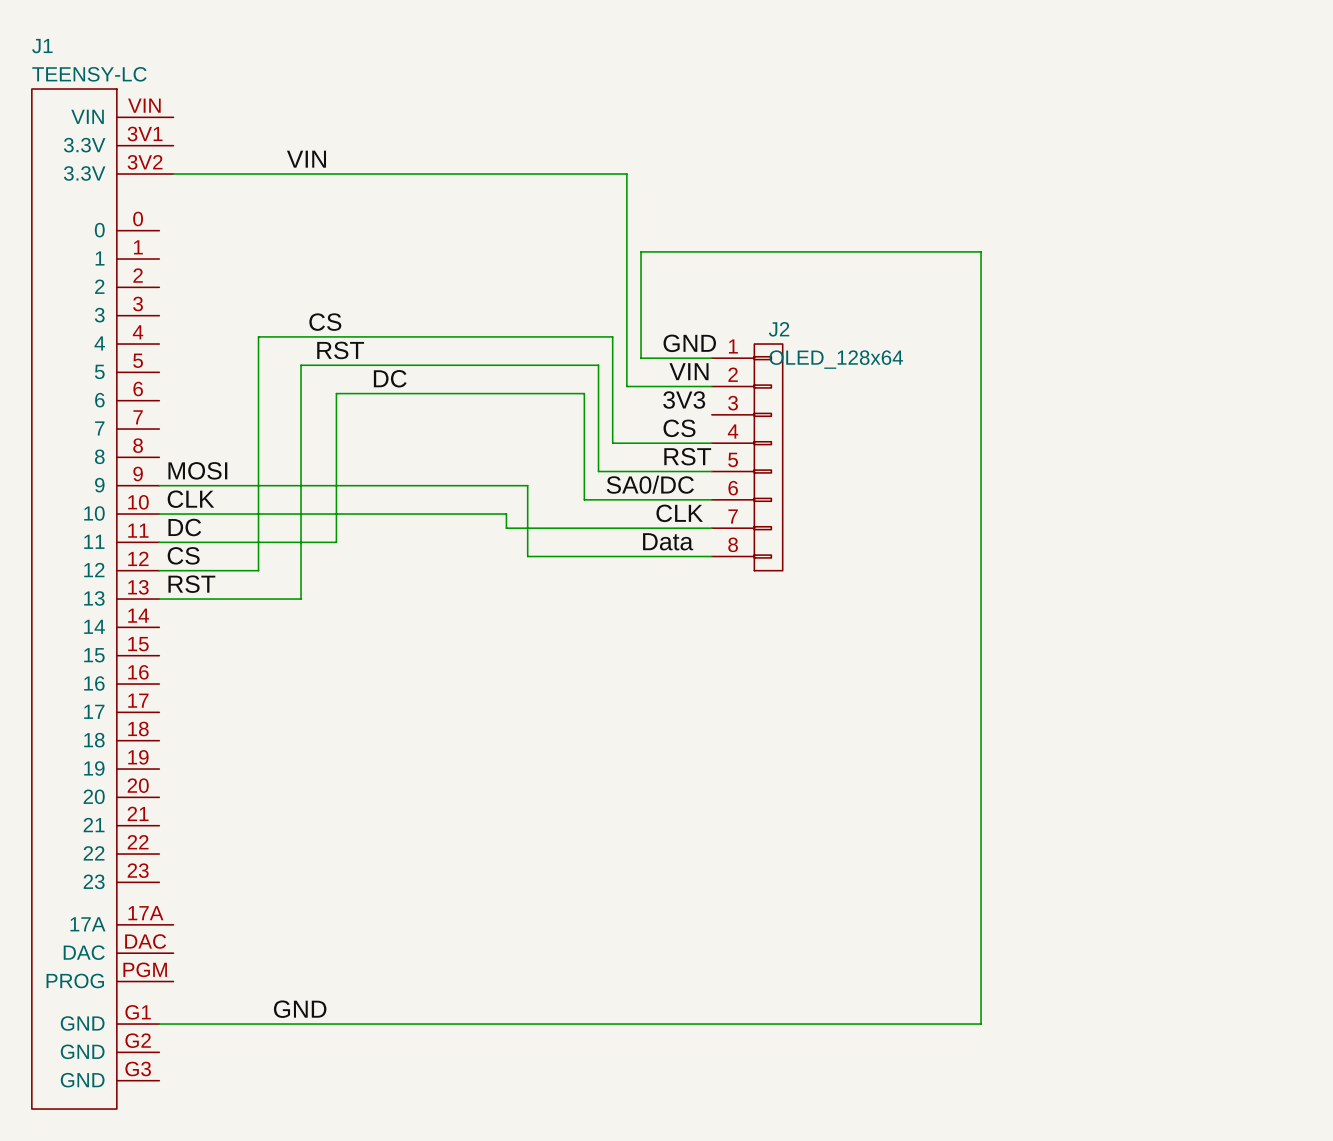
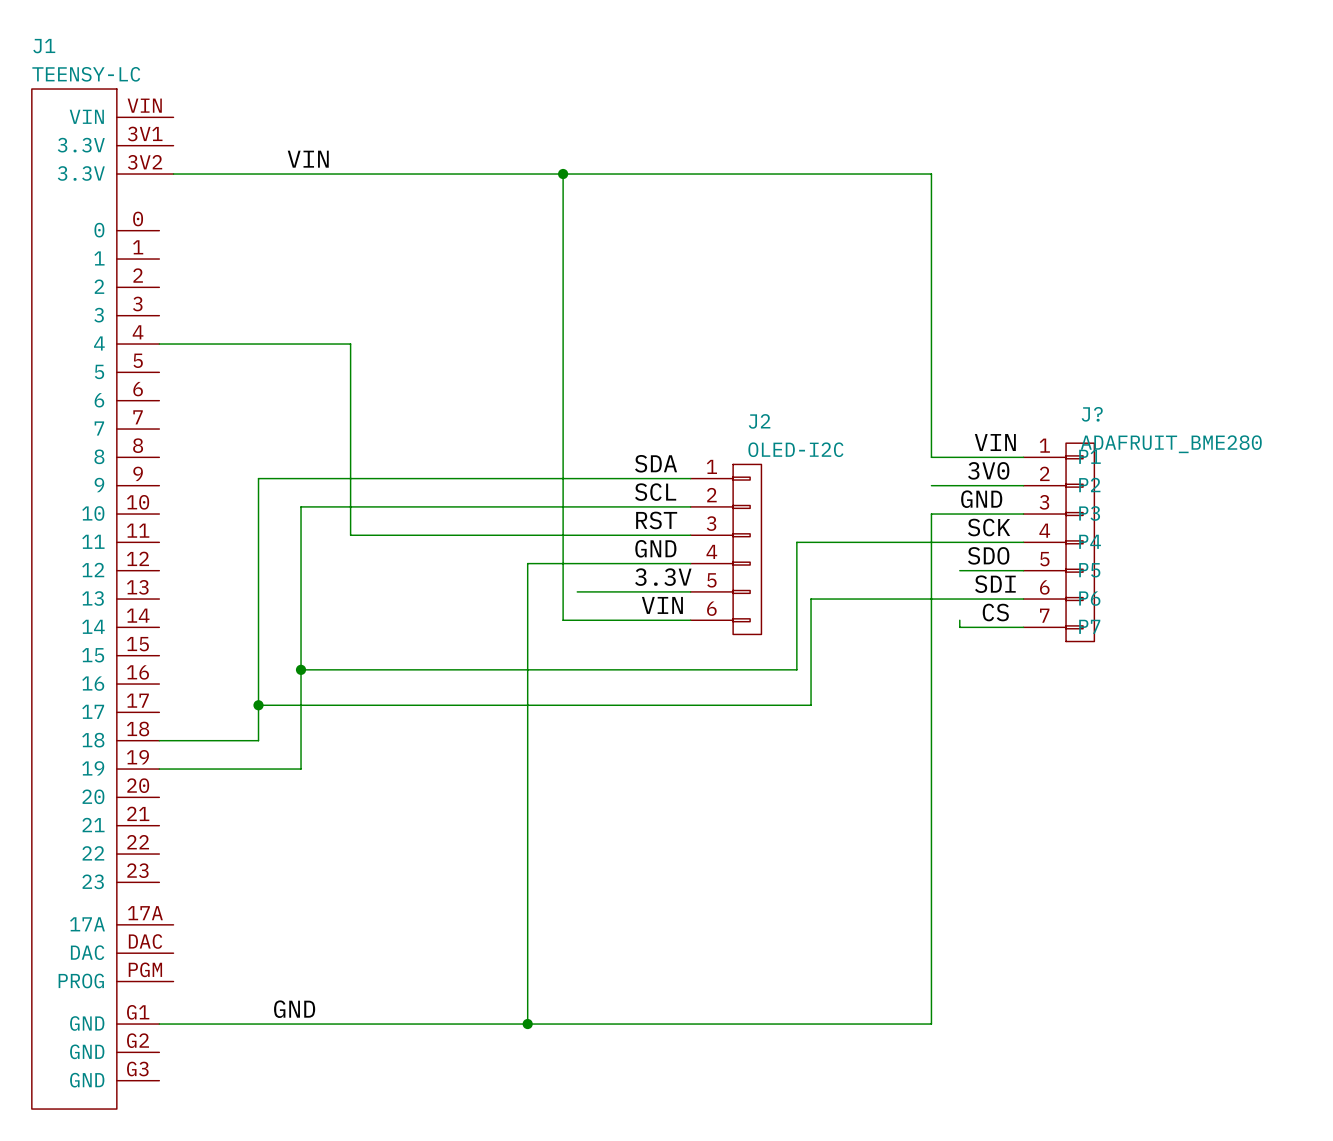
wire: none -> (563, 174) (563, 620) (690, 620)
junction: none -> (563, 174)
wire: (626, 174) (626, 386) (711, 386) -> (626, 174) (931, 174) (931, 457) (1023, 457)
label: CS (325, 322) -> none
label: GND (689, 343) -> none
wire: none -> (159, 344) (350, 344) (350, 535) (690, 535)
J2 symbol: [711, 344, 783, 571] -> [690, 464, 762, 635]
label: RST (340, 350) -> none
wire: (711, 358) (641, 358) (641, 251) (981, 251) (981, 1024) (931, 1024) -> (1023, 514) (931, 514) (931, 1024)
J2 value: OLED_128x64 (836, 359) -> OLED-I2C (795, 449)
label: VIN (689, 371) -> none
label: DC (390, 378) -> none
label: 3V3 (684, 400) -> none
label: CS (679, 428) -> none
label: none -> VIN (995, 442)
wire: (711, 443) (612, 443) (612, 336) (258, 336) (258, 478) -> (690, 478) (258, 478)
label position: RST (687, 456) -> RST (656, 520)
label: none -> SDA (656, 463)
label: MOSI (197, 470) -> none
label: none -> 3V0 (988, 470)
wire: (711, 471) (598, 471) (598, 365) (301, 365) (301, 506) -> (690, 506) (301, 506)
label: SA0/DC (650, 484) -> none
wire: (159, 485) (527, 485) (527, 556) (711, 556) -> none
wire: none -> (931, 485) (1023, 485)
label: CLK (190, 499) -> none
wire: (711, 499) (584, 499) (584, 393) (336, 393) (336, 542) (159, 542) -> none
label: none -> GND (981, 499)
label: CLK (679, 513) -> SCL (655, 492)
wire: (159, 514) (506, 514) (506, 528) (711, 528) -> none
label: DC (184, 527) -> none
label: none -> SCK (989, 527)
label: Data (668, 541) -> GND (655, 548)
wire: none -> (1023, 542) (796, 542) (796, 669) (301, 669)
J?: none -> ADAFRUIT_BME280 (1058, 542)
label: CS (183, 555) -> none
label: none -> SDO (988, 555)
wire: none -> (690, 563) (527, 563) (527, 1024)
wire: (159, 570) (258, 570) -> (159, 740) (258, 740) (258, 570)
wire: none -> (959, 570) (1023, 570)
label: none -> 3.3V (663, 577)
label: RST (191, 584) -> none
label: none -> SDI (995, 584)
wire: none -> (577, 591) (690, 591)
wire: (159, 599) (301, 599) -> (159, 769) (301, 769) (301, 599)
wire: none -> (1023, 599) (811, 599) (811, 705) (258, 705)
label: none -> VIN (662, 605)
label: none -> CS (995, 612)
wire: none -> (959, 620) (959, 627) (1023, 627)
junction: none -> (301, 669)
junction: none -> (258, 705)
junction: none -> (527, 1024)

